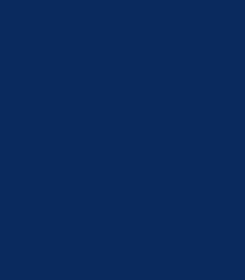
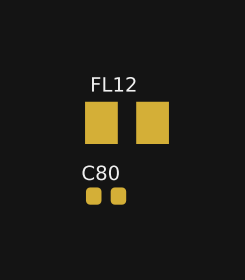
FL12: none -> (127, 122)
C80: none -> (106, 196)

